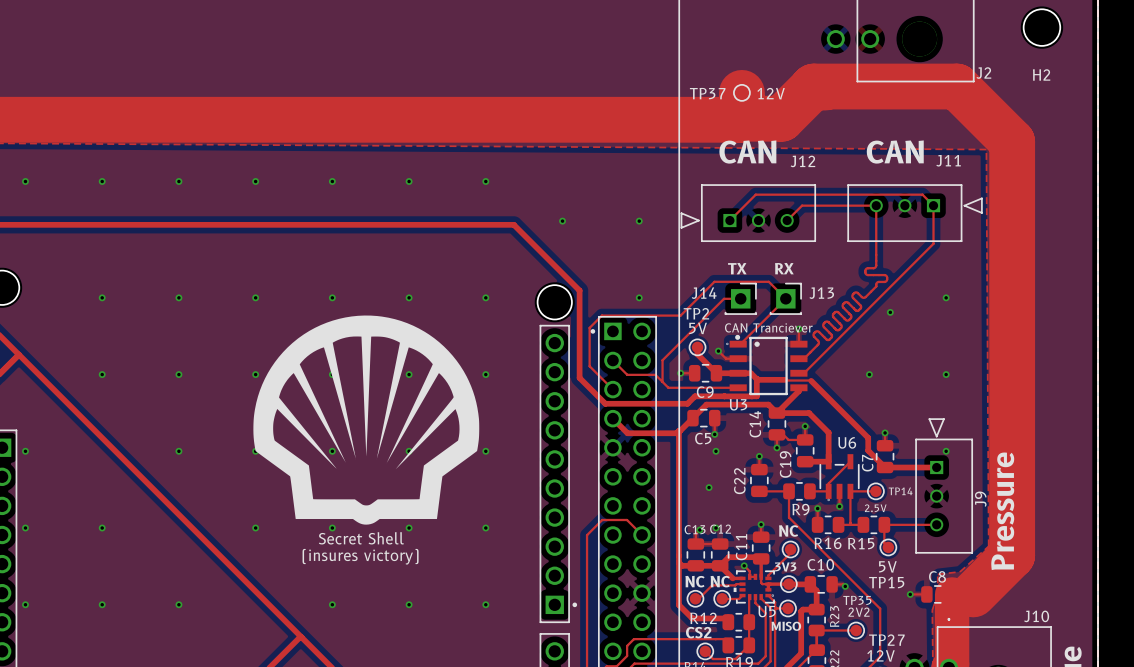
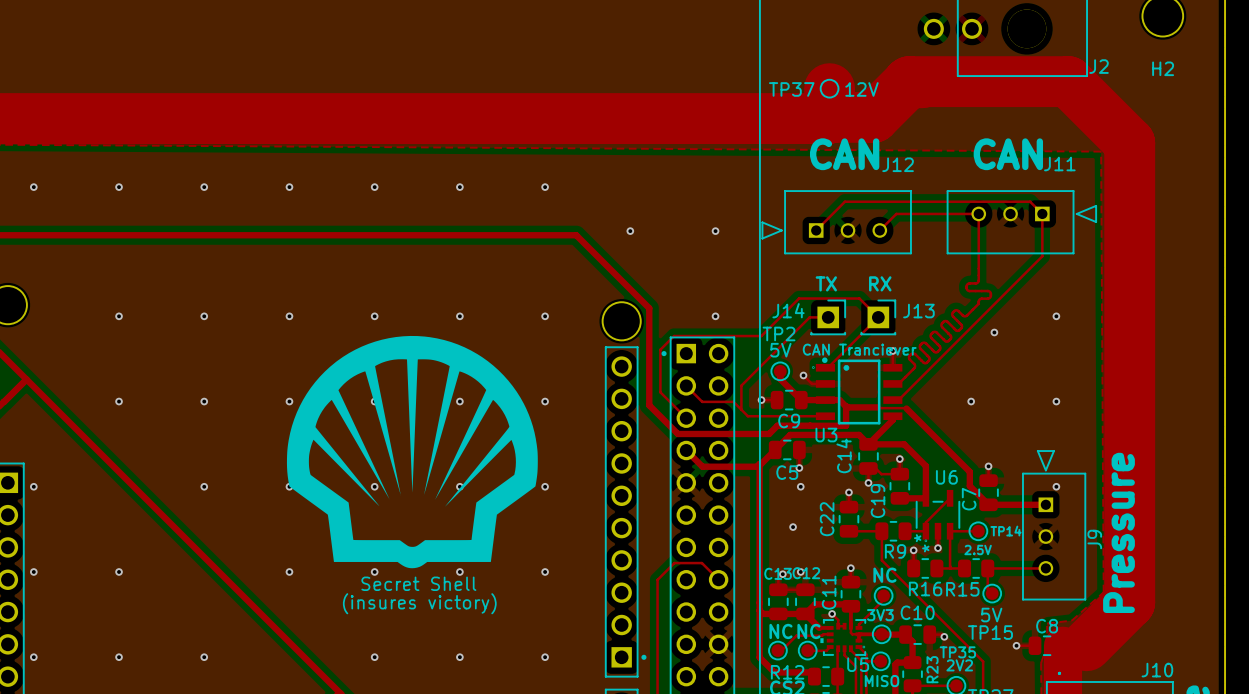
U6 text: none -> * (917, 538)
U6 text: none -> * (925, 548)

